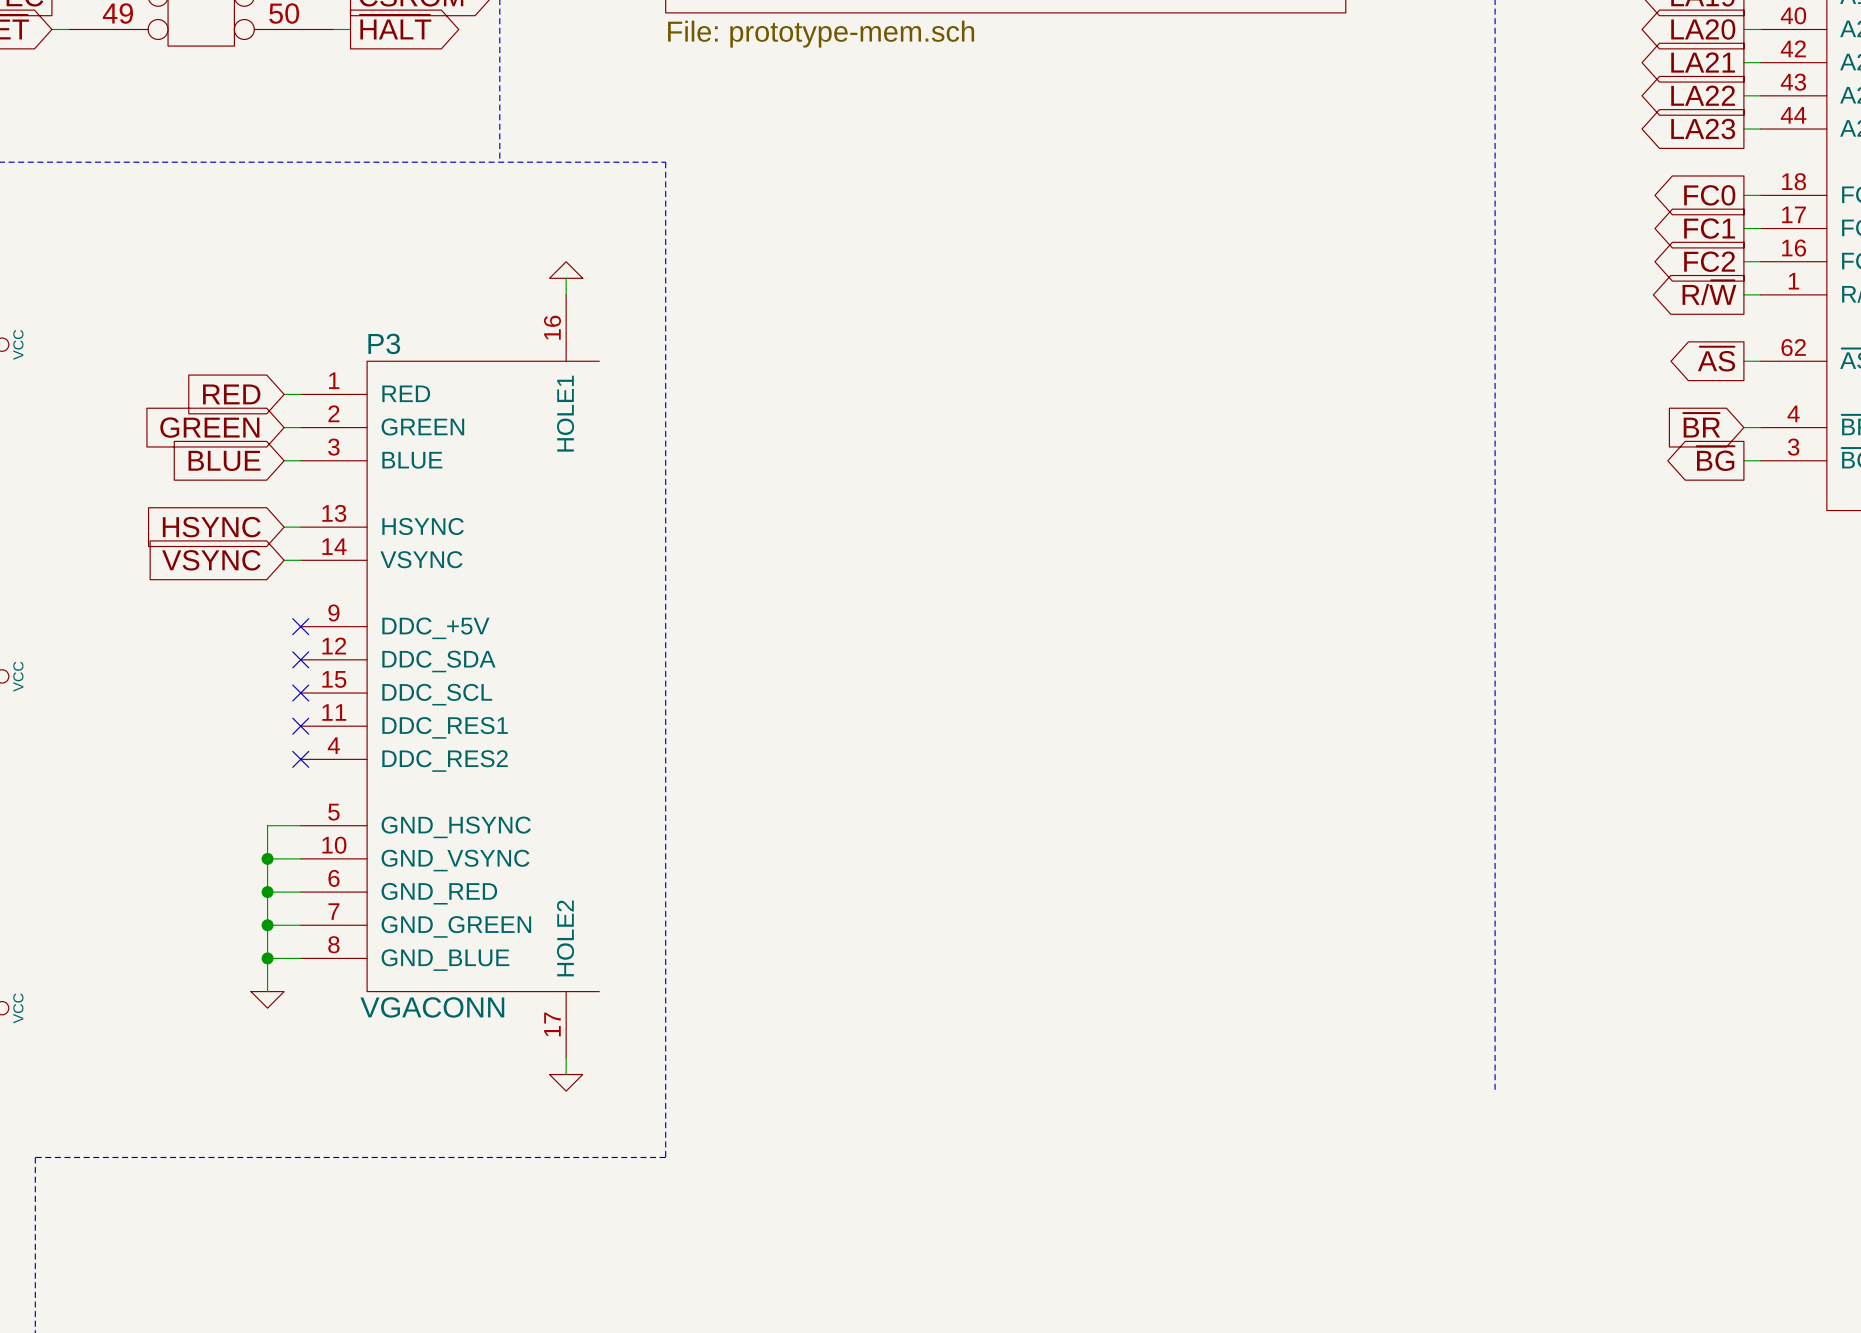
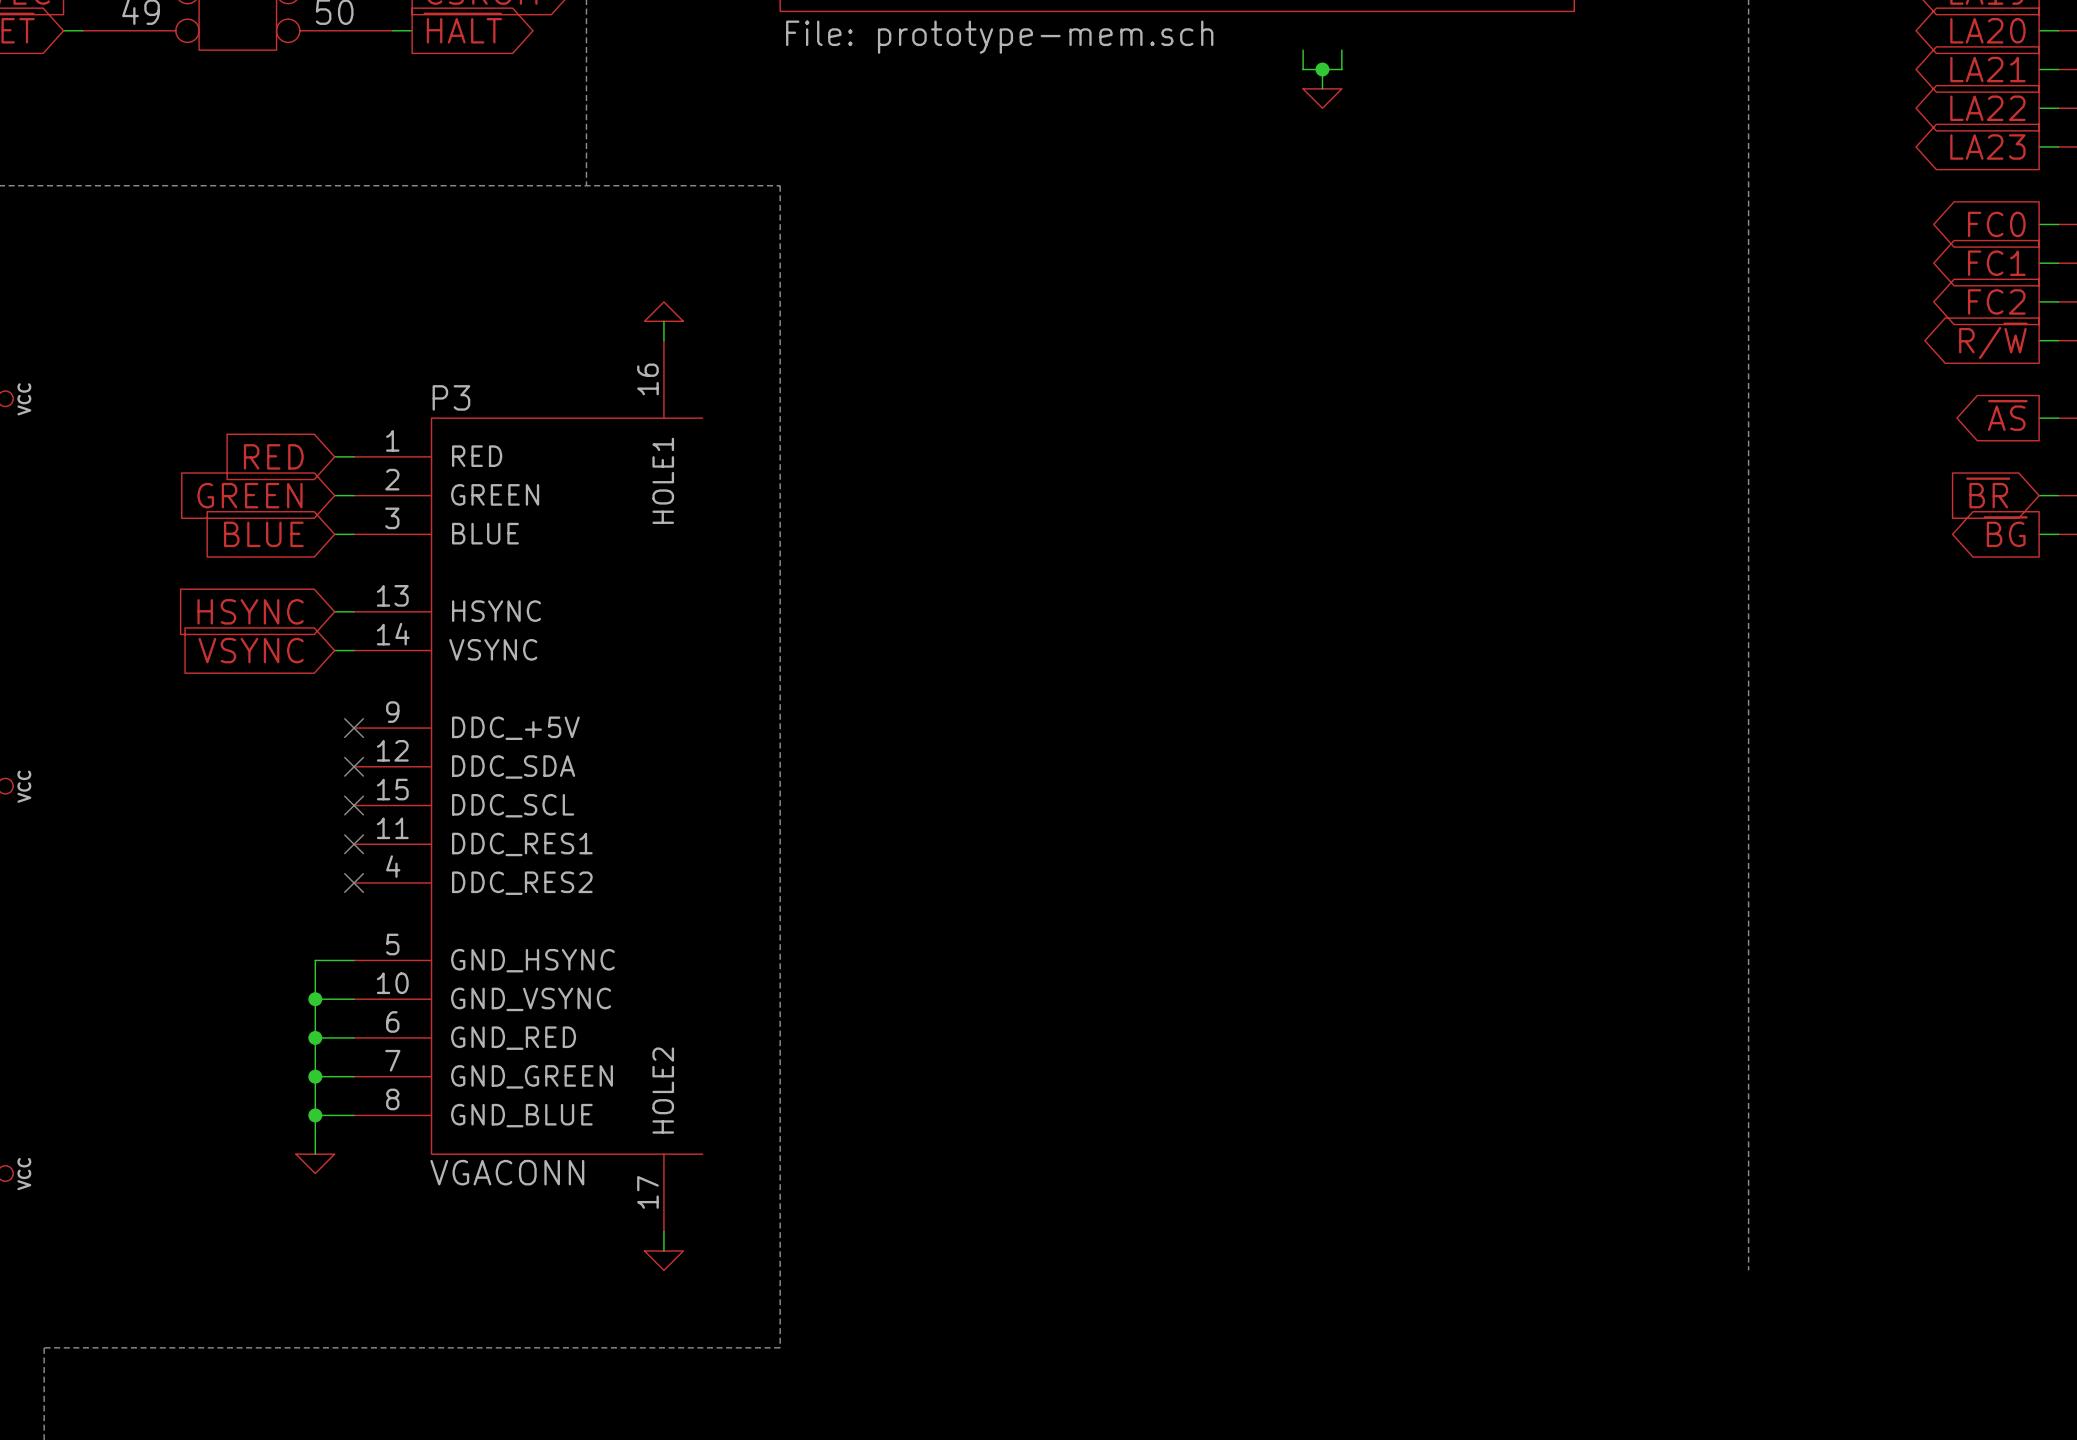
wire: none -> (1303, 50) (1303, 69) (1341, 69) (1341, 50)
wire: none -> (1322, 69) (1322, 88)
junction: none -> (1322, 69)
power symbol: none -> (1322, 98)

